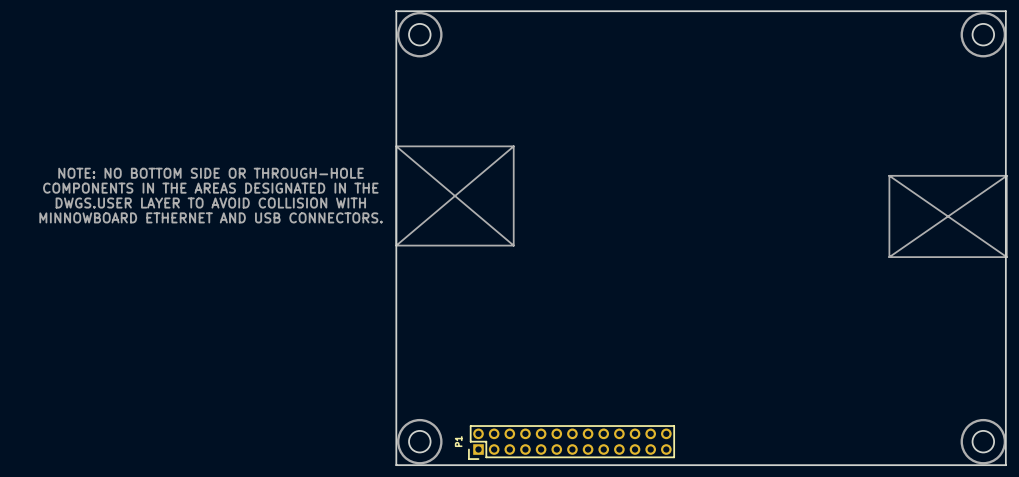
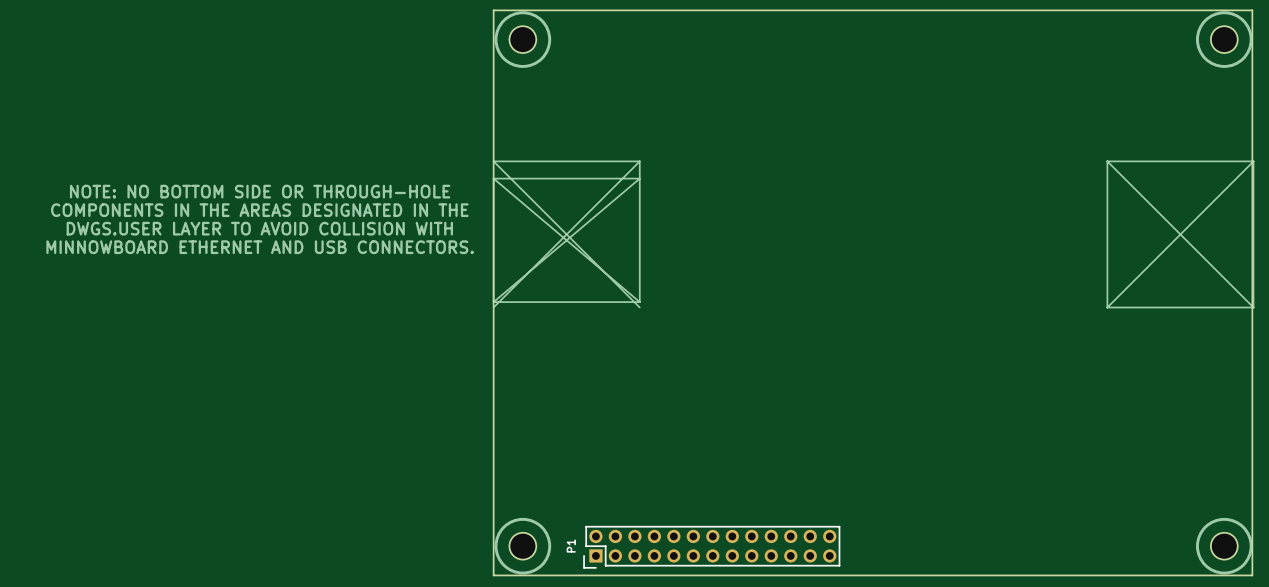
line: none -> (639, 161) (493, 161) (639, 307)
line: none -> (639, 161) (639, 178)
line: none -> (639, 161) (493, 307)
line: none -> (1107, 161) (1253, 307) (1107, 307) (1253, 161)
line: none -> (1107, 161) (1107, 215)
line: none -> (1253, 161) (1253, 215)
text position: NOTE: NO BOTTOM SIDE OR THROUGH-HOLE (211, 173) -> NOTE: NO BOTTOM SIDE OR THROUGH-HOLE (260, 191)
text position: COMPONENTS IN THE AREAS DESIGNATED IN THE (210, 188) -> COMPONENTS IN THE AREAS DESIGNATED IN THE (259, 210)
text position: DWGS.USER LAYER TO AVOID COLLISION WITH (210, 203) -> DWGS.USER LAYER TO AVOID COLLISION WITH (259, 228)
text position: MINNOWBOARD ETHERNET AND USB CONNECTORS. (211, 217) -> MINNOWBOARD ETHERNET AND USB CONNECTORS. (260, 247)
line: (889, 249) (889, 257) -> none
line: (1006, 249) (1006, 257) -> none
line: (889, 257) (1006, 257) -> (1107, 161) (1253, 161)
line: (889, 257) (1006, 175) (889, 175) (1006, 257) -> none

